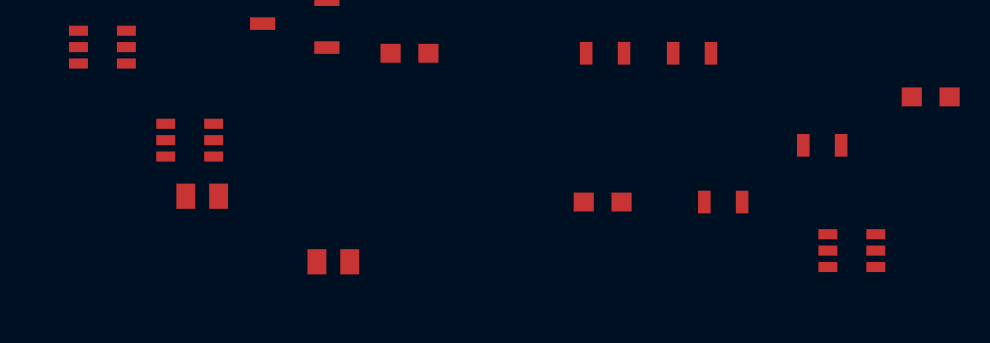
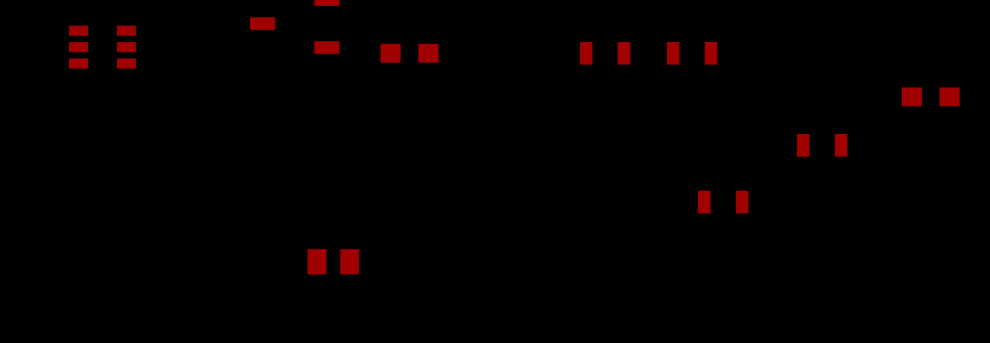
part: (189, 140) -> none
part: (202, 196) -> none
part: (602, 202) -> none
part: (851, 250) -> none

